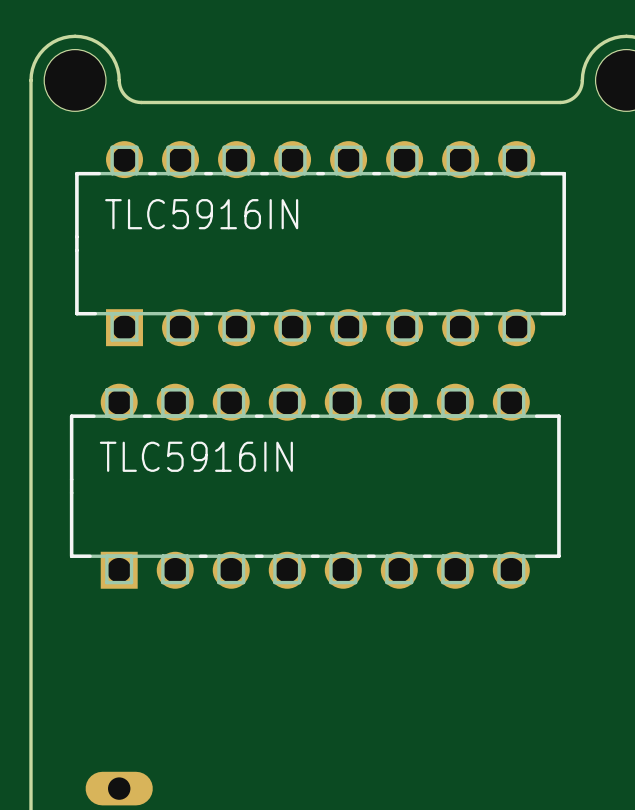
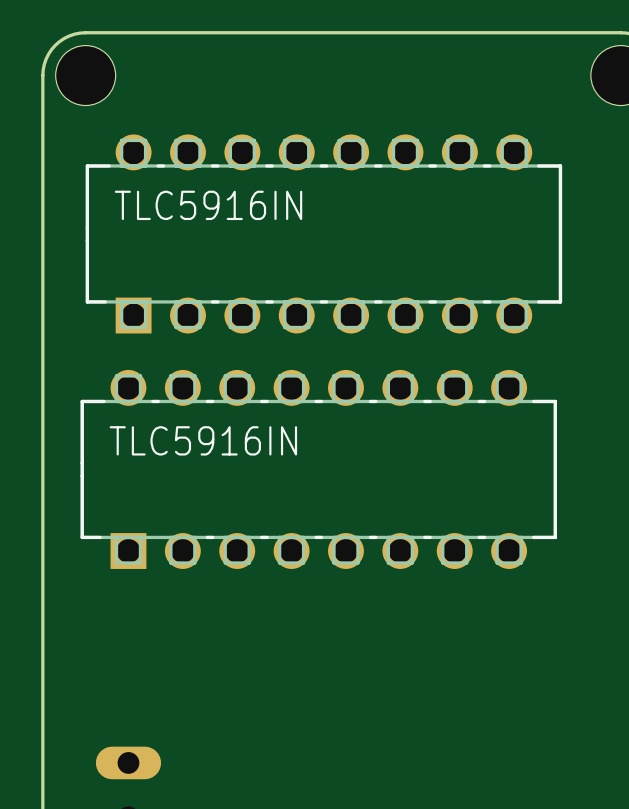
board edge: (75, 36) (91, 39) (106, 49) (115, 63) (122, 91) (130, 99) (141, 102) (563, 102) (573, 97) (579, 91) (585, 63) (595, 49) (609, 39) (626, 36) -> (85, 32) (620, 32)

